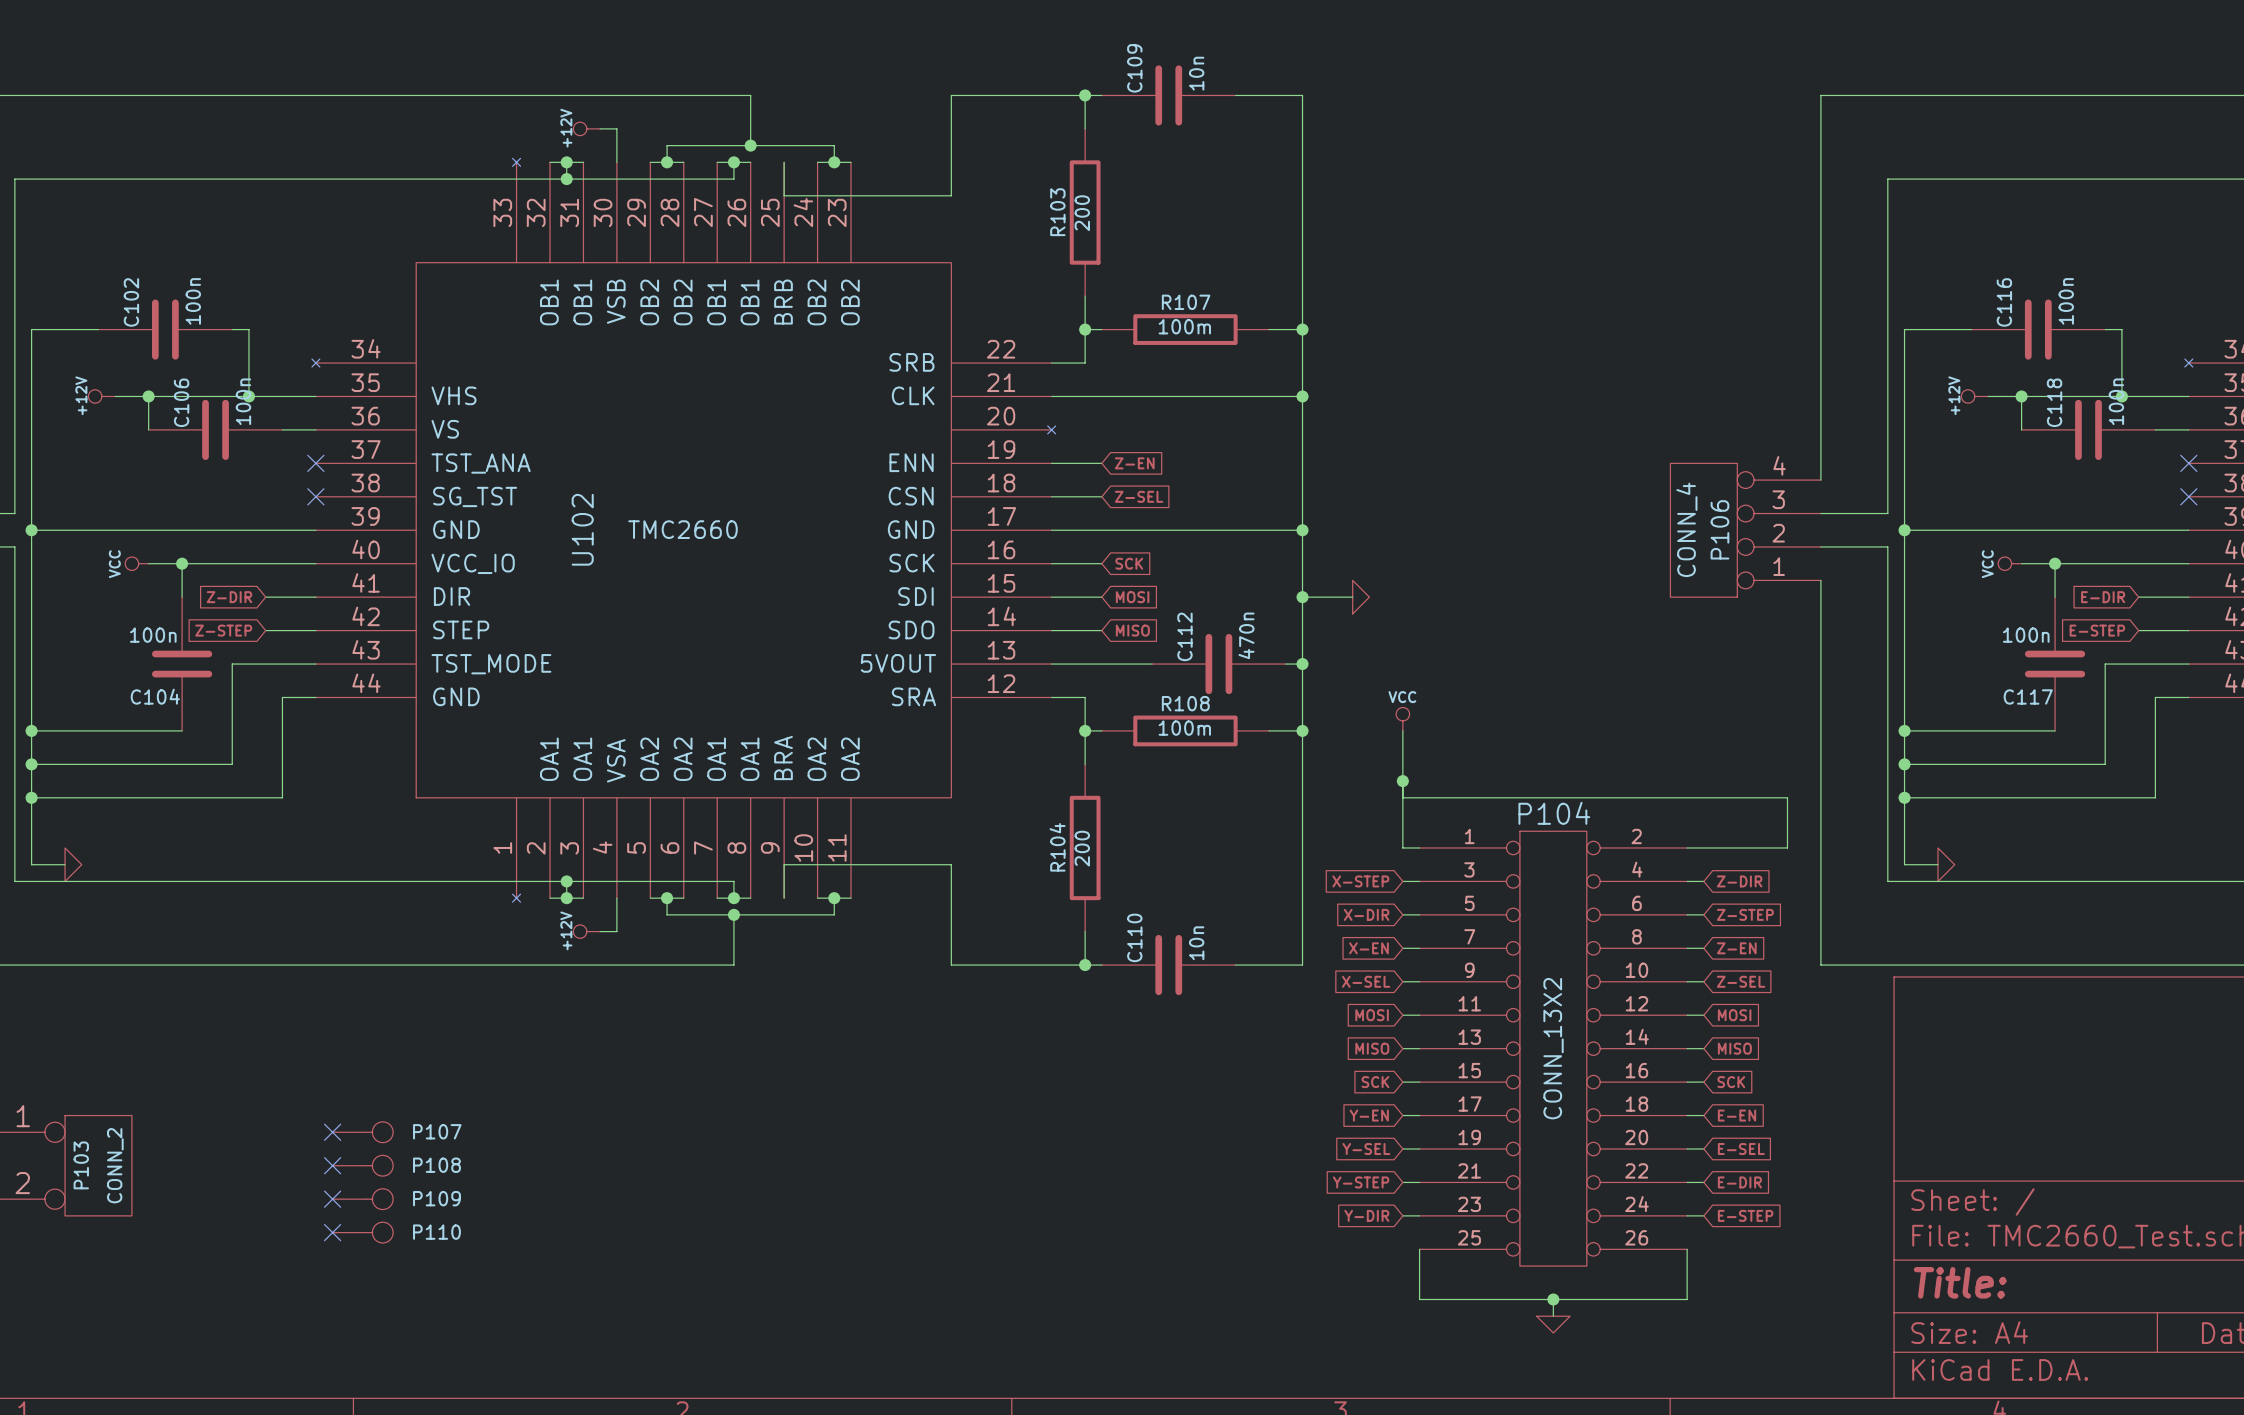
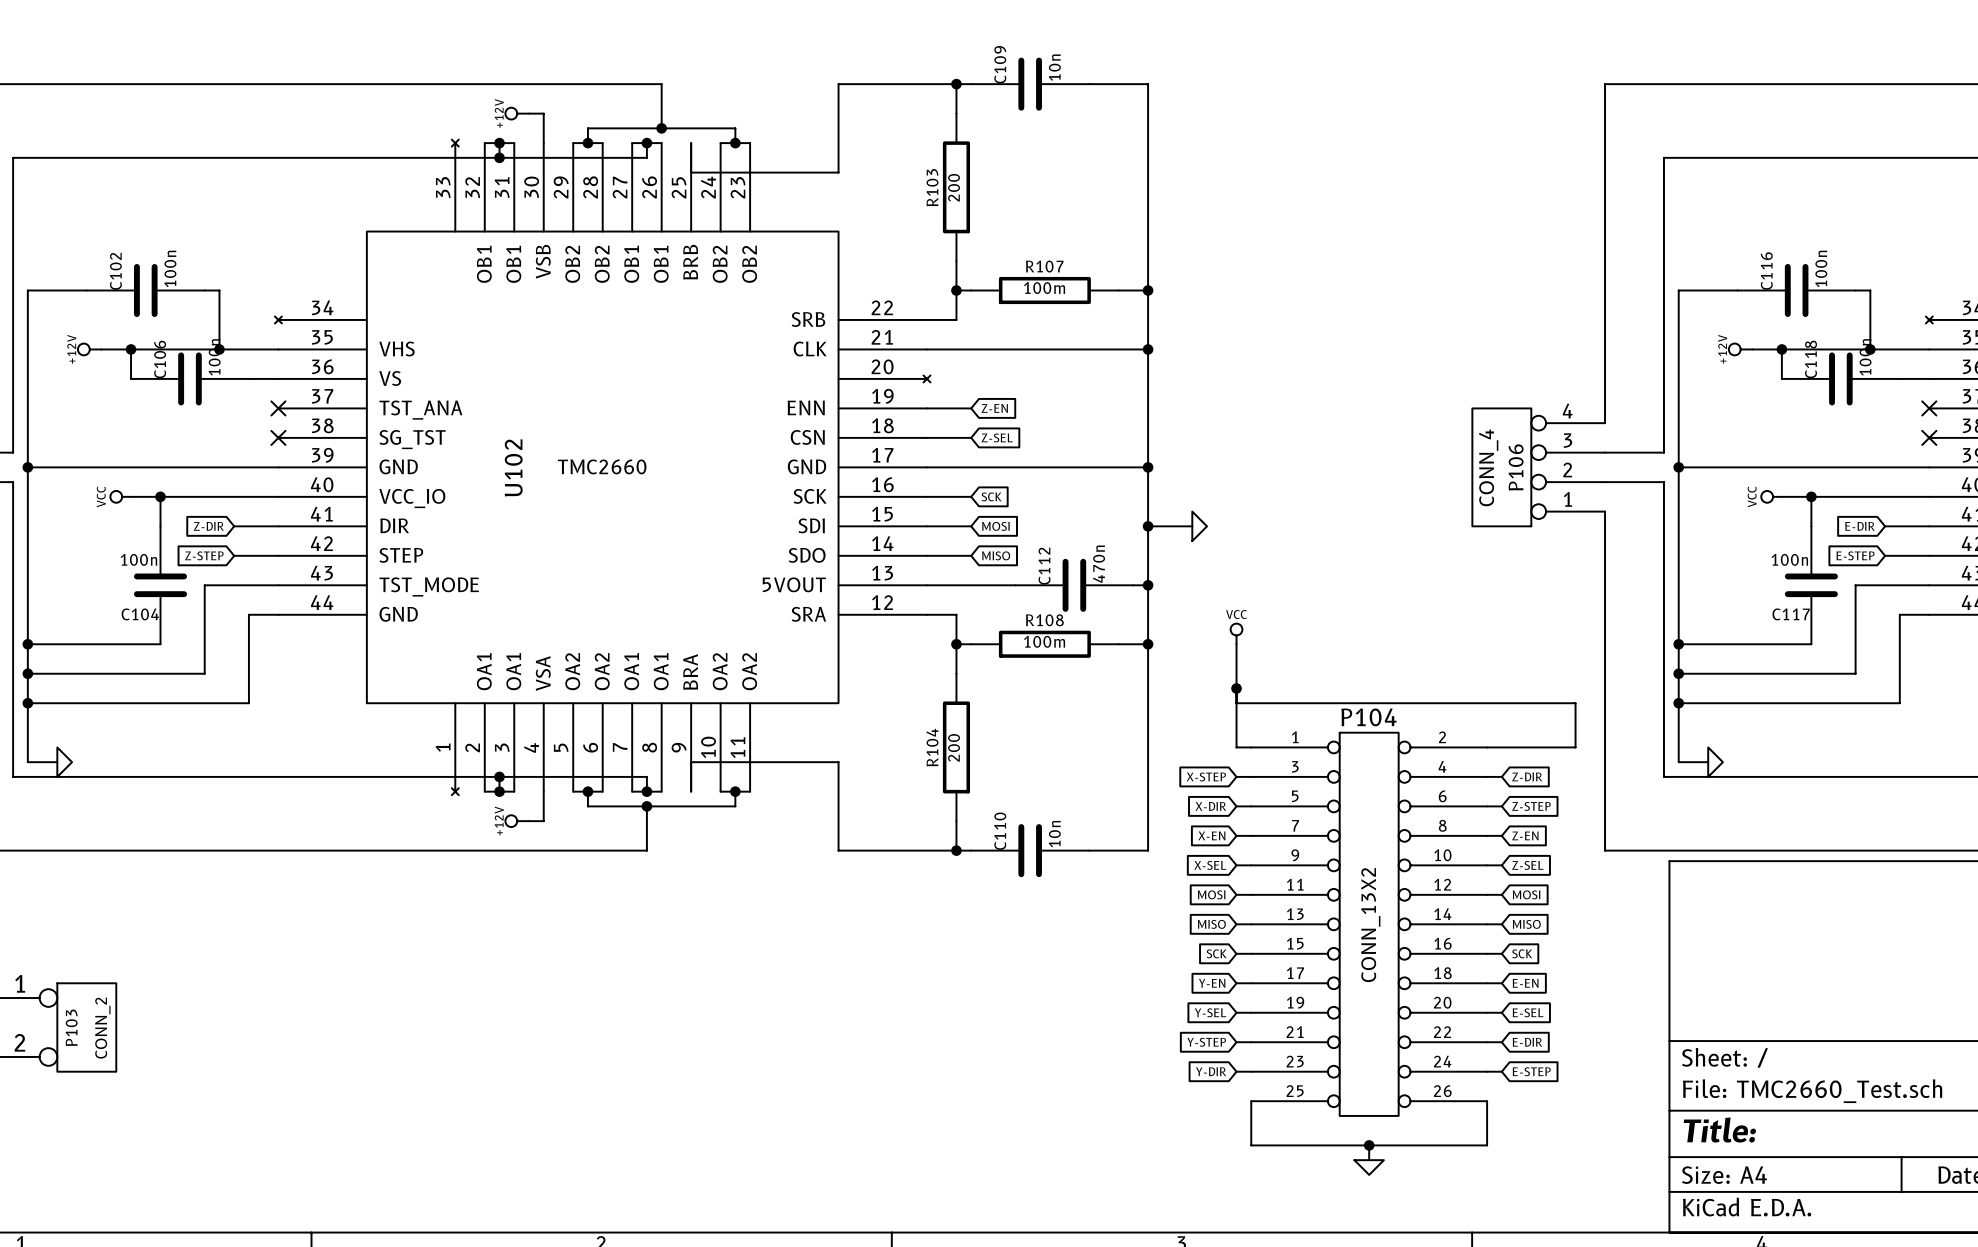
no-connect mark: (332, 1132) -> none
P107: (362, 1132) -> none
no-connect mark: (332, 1165) -> none
P108: (362, 1165) -> none
no-connect mark: (332, 1199) -> none
P109: (362, 1199) -> none
no-connect mark: (332, 1232) -> none
P110: (362, 1232) -> none

